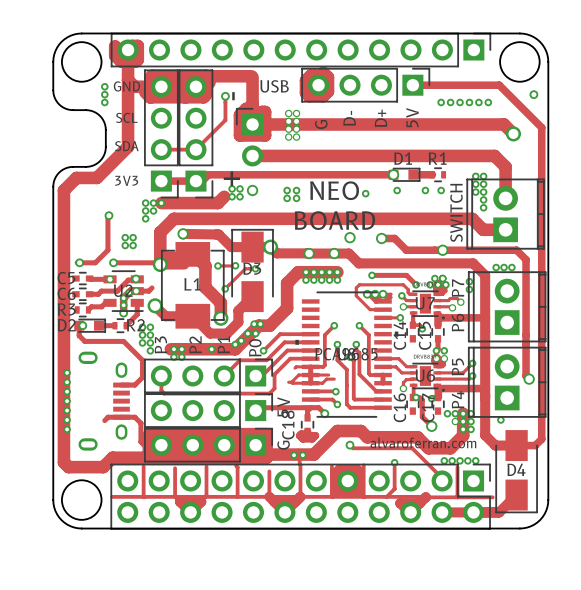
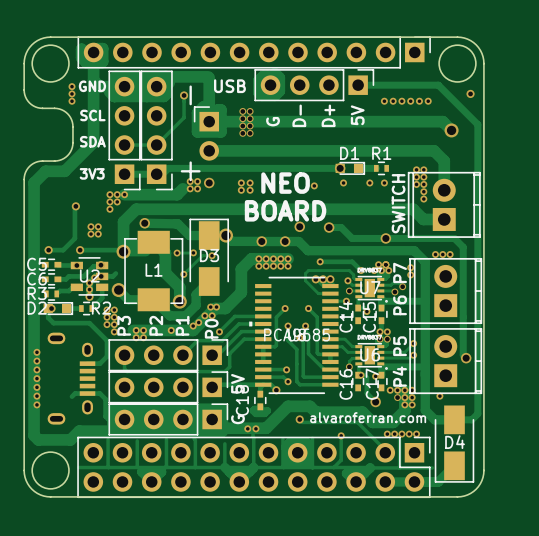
track: (383, 294) (390, 294) (387, 297) (390, 297) (386, 301) (383, 301) -> none
track: (310, 366) (294, 368) -> none
track: (328, 375) (298, 375) (291, 382) -> none
track: (334, 379) (326, 379) (322, 383) (291, 382) -> none
track: (288, 382) (291, 382) -> none

